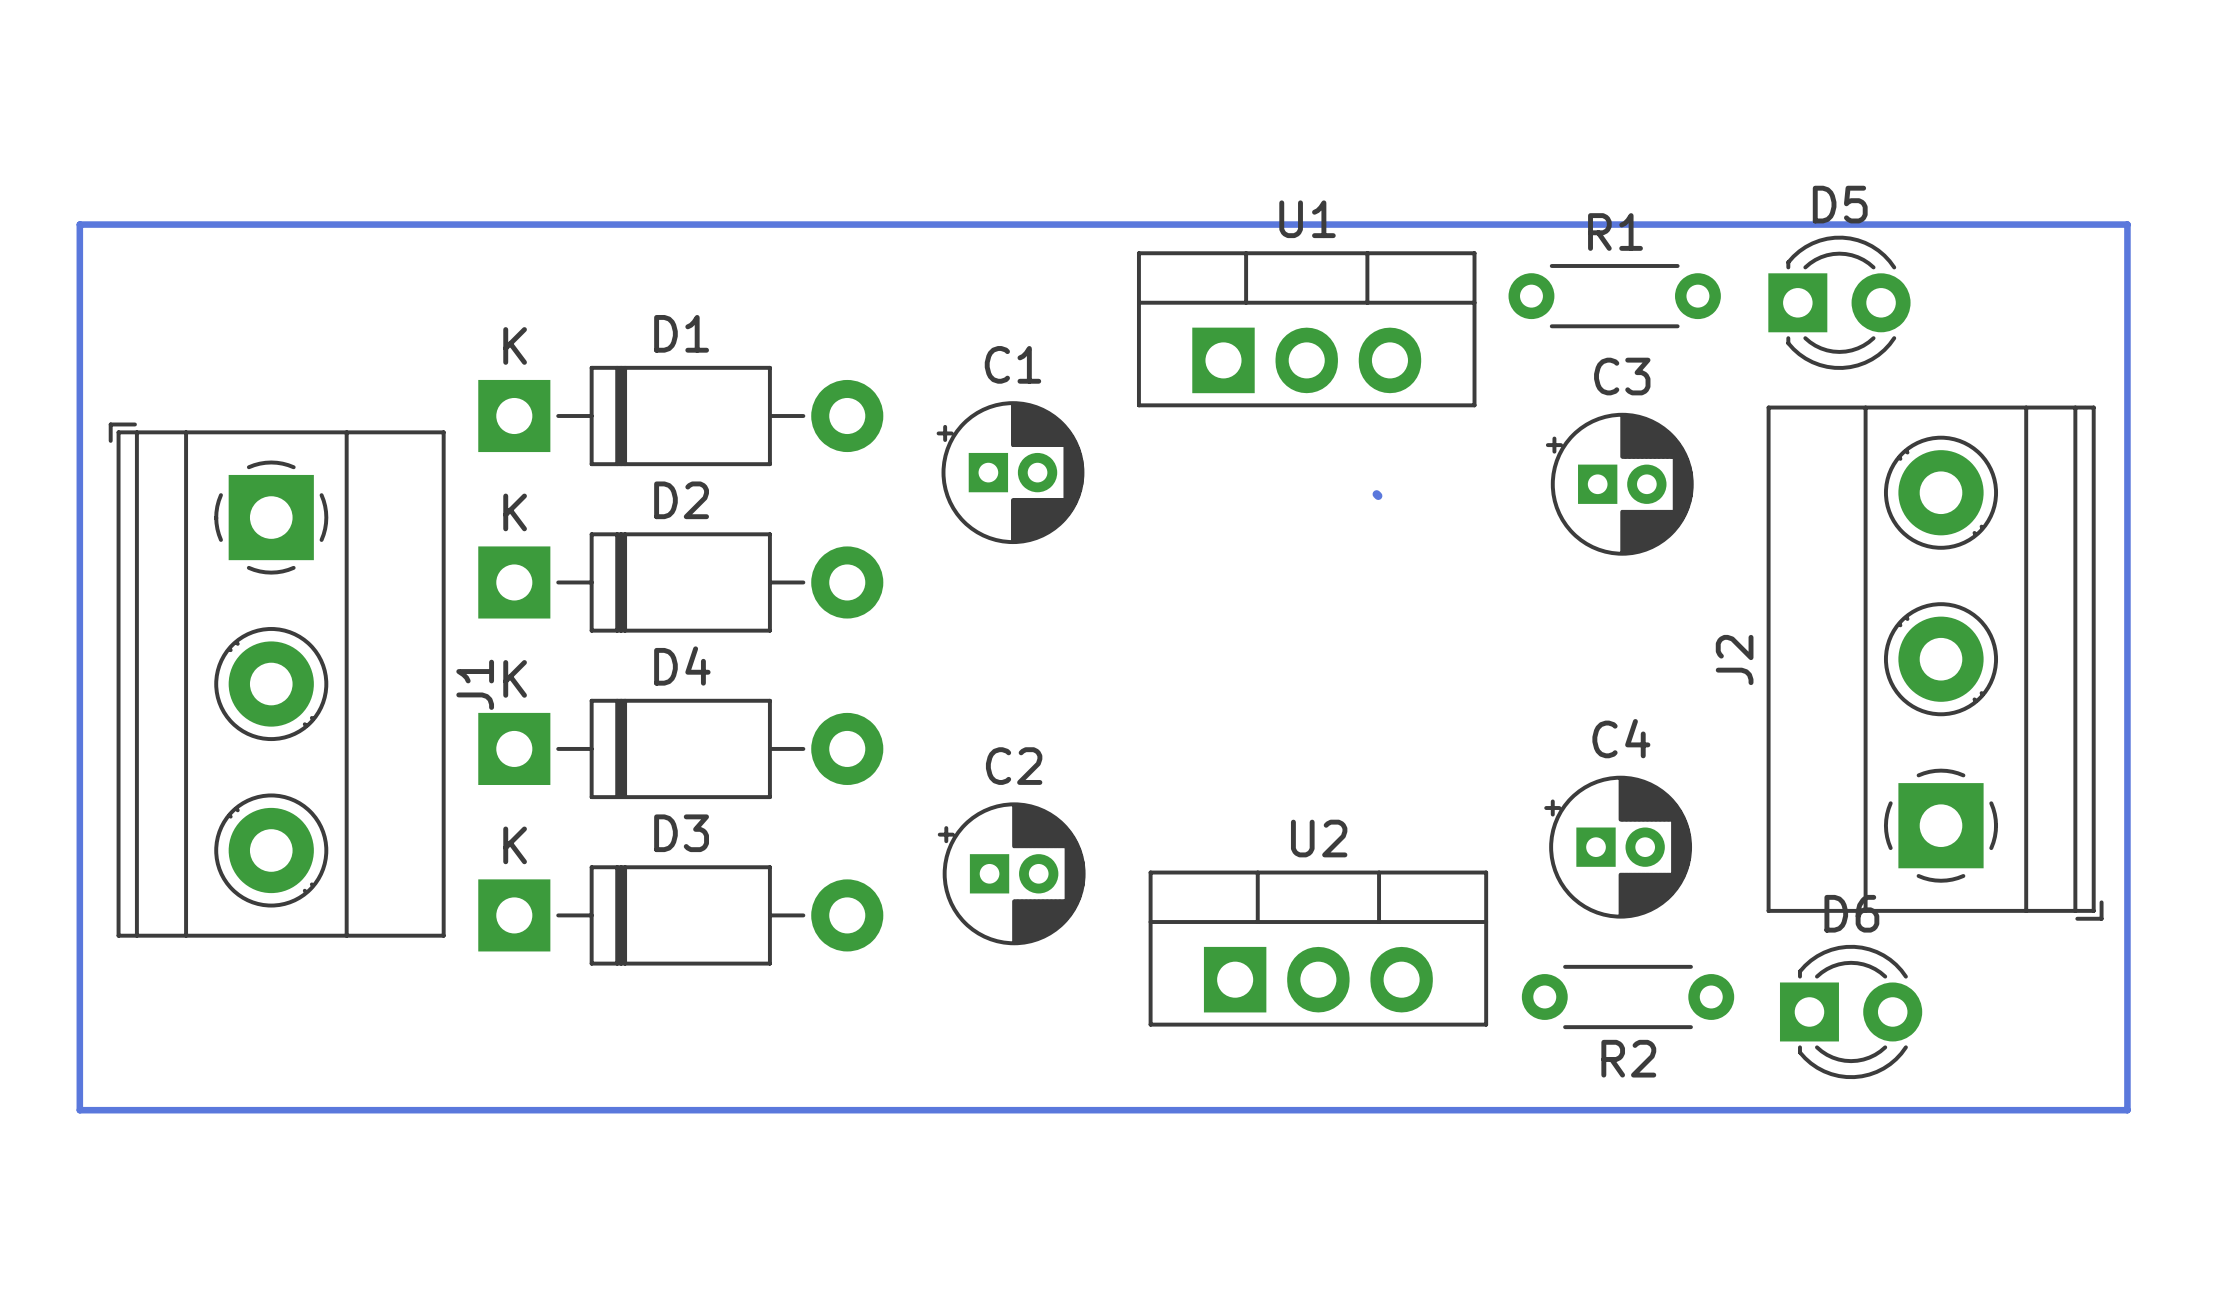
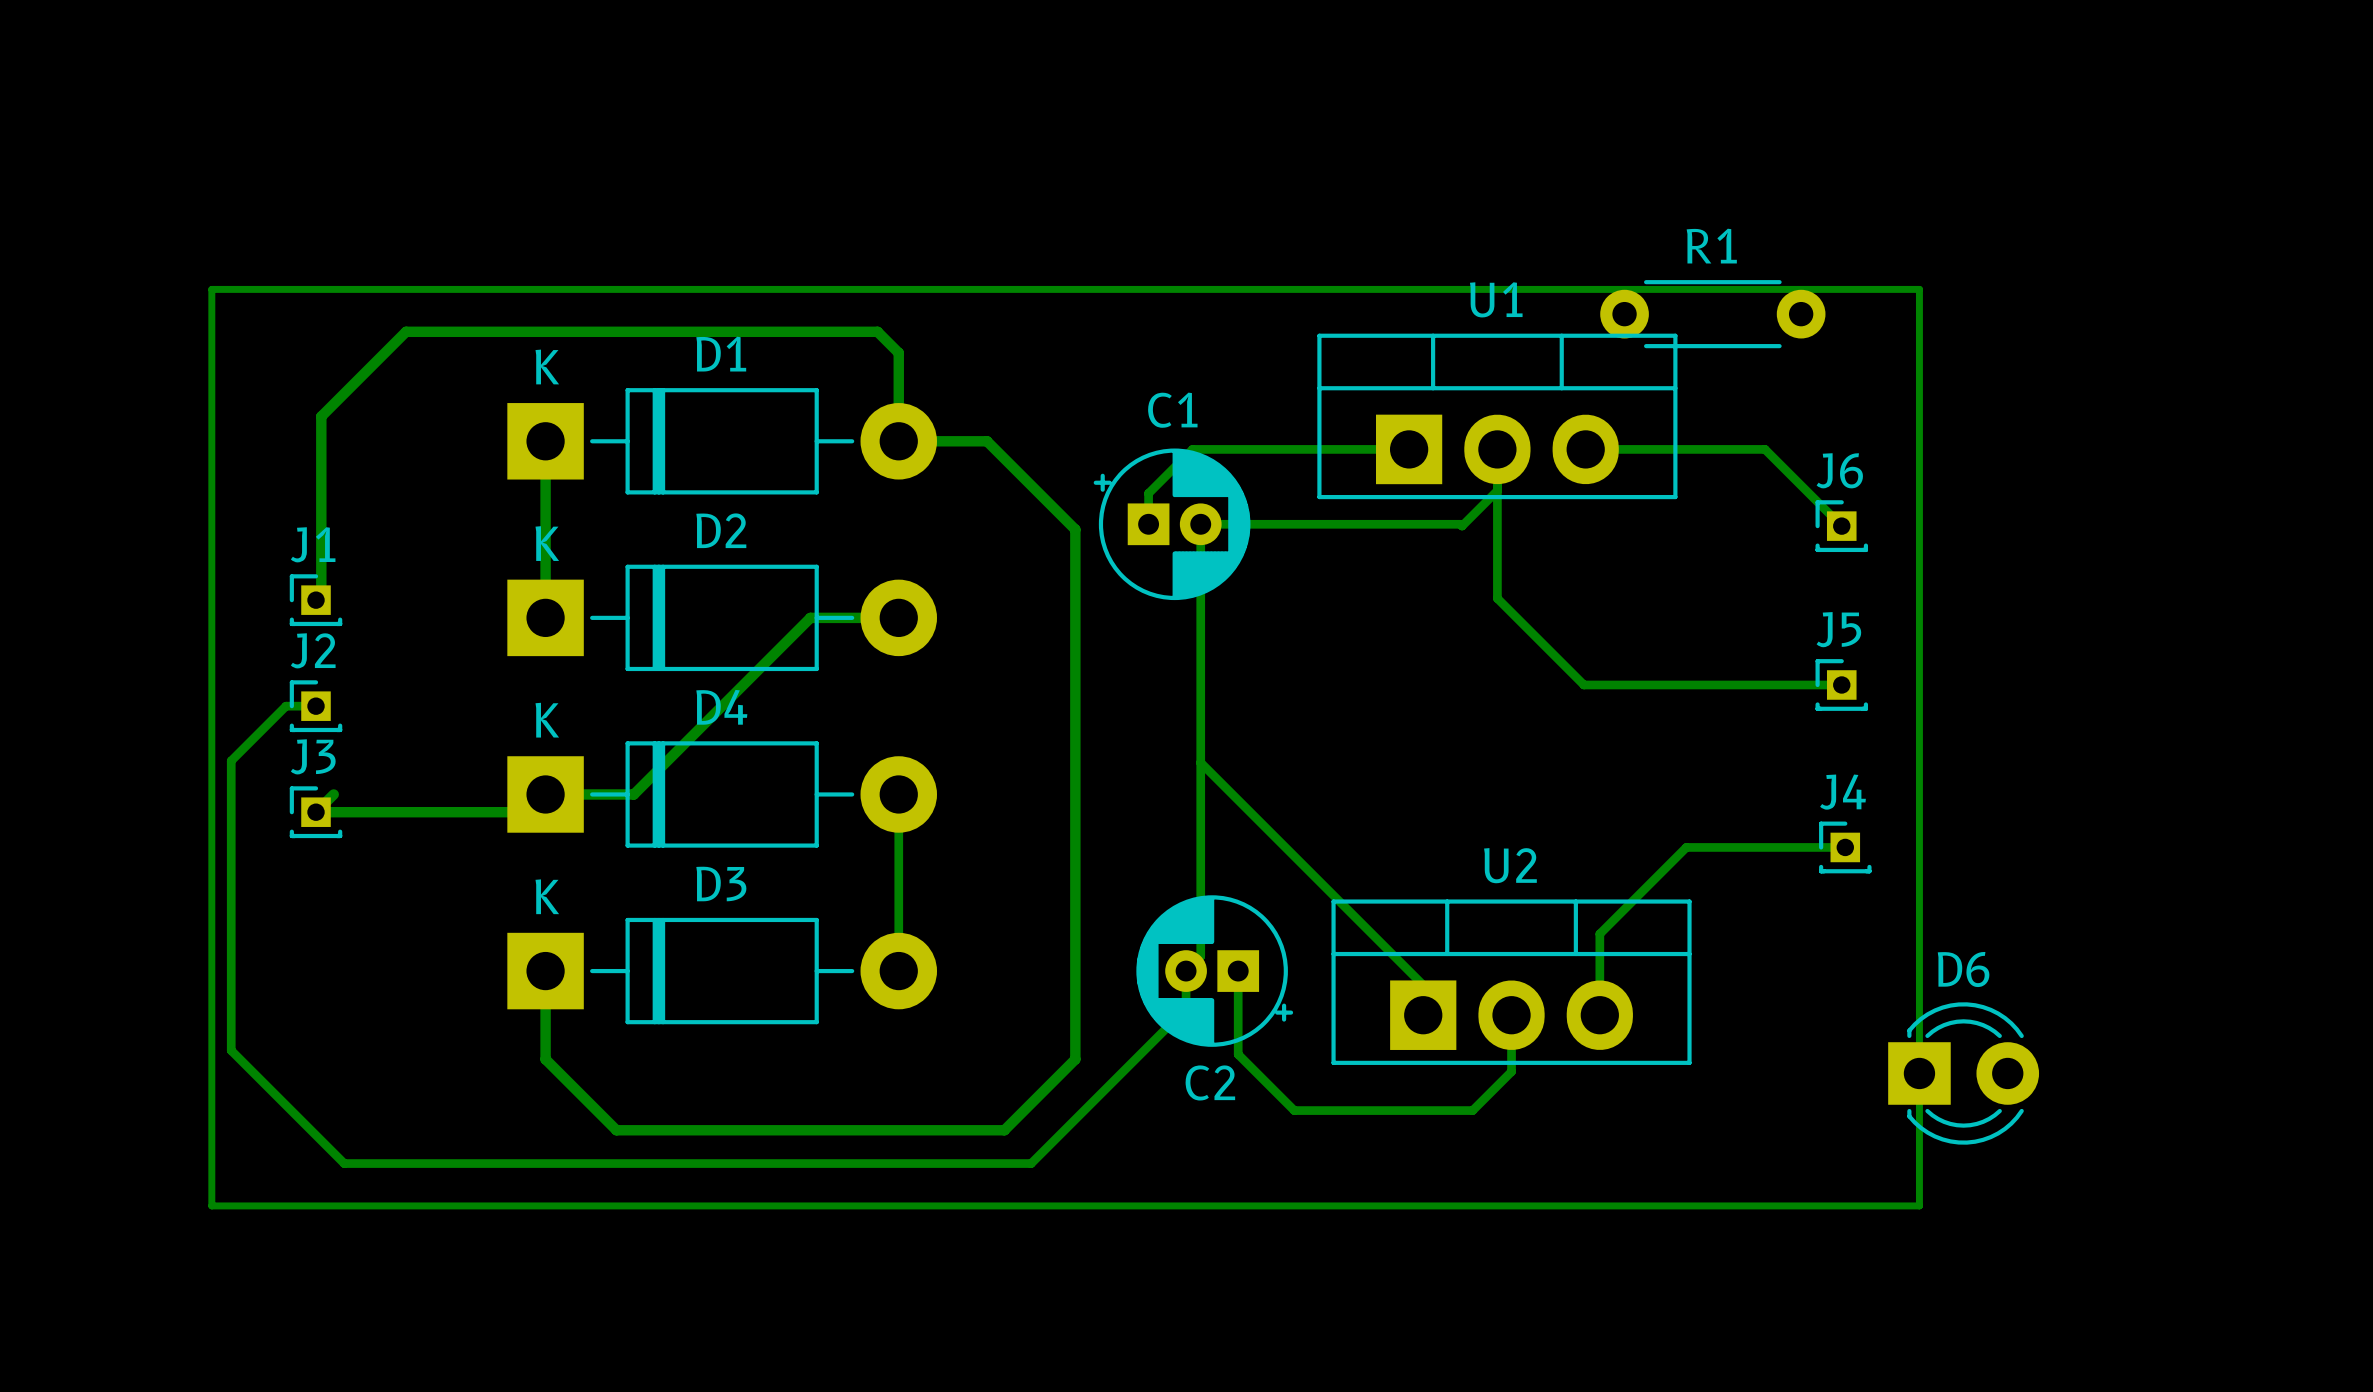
bottom track: (79, 224) (2127, 224) (2127, 1110) (79, 1110) (79, 224) -> (211, 289) (211, 1205) (1919, 1205) (1919, 289) (211, 289)
D5: (1839, 302) -> none
U1 position: (1306, 329) -> (1497, 416)
J2 footprint: [1766, 405, 2104, 921] -> [289, 680, 343, 733]
bottom track: none -> (545, 441) (545, 617)
J1 footprint: [108, 422, 446, 938] -> [289, 574, 343, 627]
bottom track: none -> (1409, 449) (1192, 449) (1148, 493) (1148, 524)
bottom track: none -> (1497, 449) (1497, 598) (1583, 684) (1841, 684)
bottom track: none -> (1585, 449) (1765, 449) (1841, 526)
bottom track: none -> (1497, 490) (1462, 526)
C1 position: (1010, 472) -> (1172, 524)
C3: (1619, 484) -> none
bottom track: none -> (1460, 524) (1200, 524) (1200, 956) (1186, 971) (1186, 1008) (1031, 1163) (344, 1163) (231, 1050) (231, 760) (285, 706) (316, 706)
J6: none -> (1841, 526)
bottom track: none -> (314, 600) (321, 593) (321, 416) (406, 331) (877, 331) (898, 352) (898, 441) (987, 441) (1075, 529) (1075, 1059) (1004, 1130) (616, 1130) (545, 1059) (545, 971)
bottom track: none -> (898, 617) (810, 617) (633, 794) (545, 794)
J5: none -> (1841, 684)
J2 name position: J2 (1734, 660) -> J2 (313, 650)
J1 name position: J1 (475, 684) -> J1 (313, 544)
bottom track: none -> (1200, 762) (1423, 985) (1423, 1015)
bottom track: none -> (333, 794) (316, 812) (527, 812)
bottom track: none -> (898, 794) (898, 971)
J3: none -> (316, 812)
bottom track: none -> (1845, 847) (1686, 847) (1599, 933) (1599, 1015)
J4: none -> (1845, 847)
C4: (1618, 847) -> none
C2 rotation: 0° (1011, 873) -> 180° (1214, 971)
C2 position: (1011, 873) -> (1214, 971)
bottom track: none -> (1238, 971) (1238, 1054) (1294, 1110) (1472, 1110) (1511, 1071) (1511, 1015)
U2 position: (1318, 948) -> (1511, 982)
R2: (1628, 996) -> none

